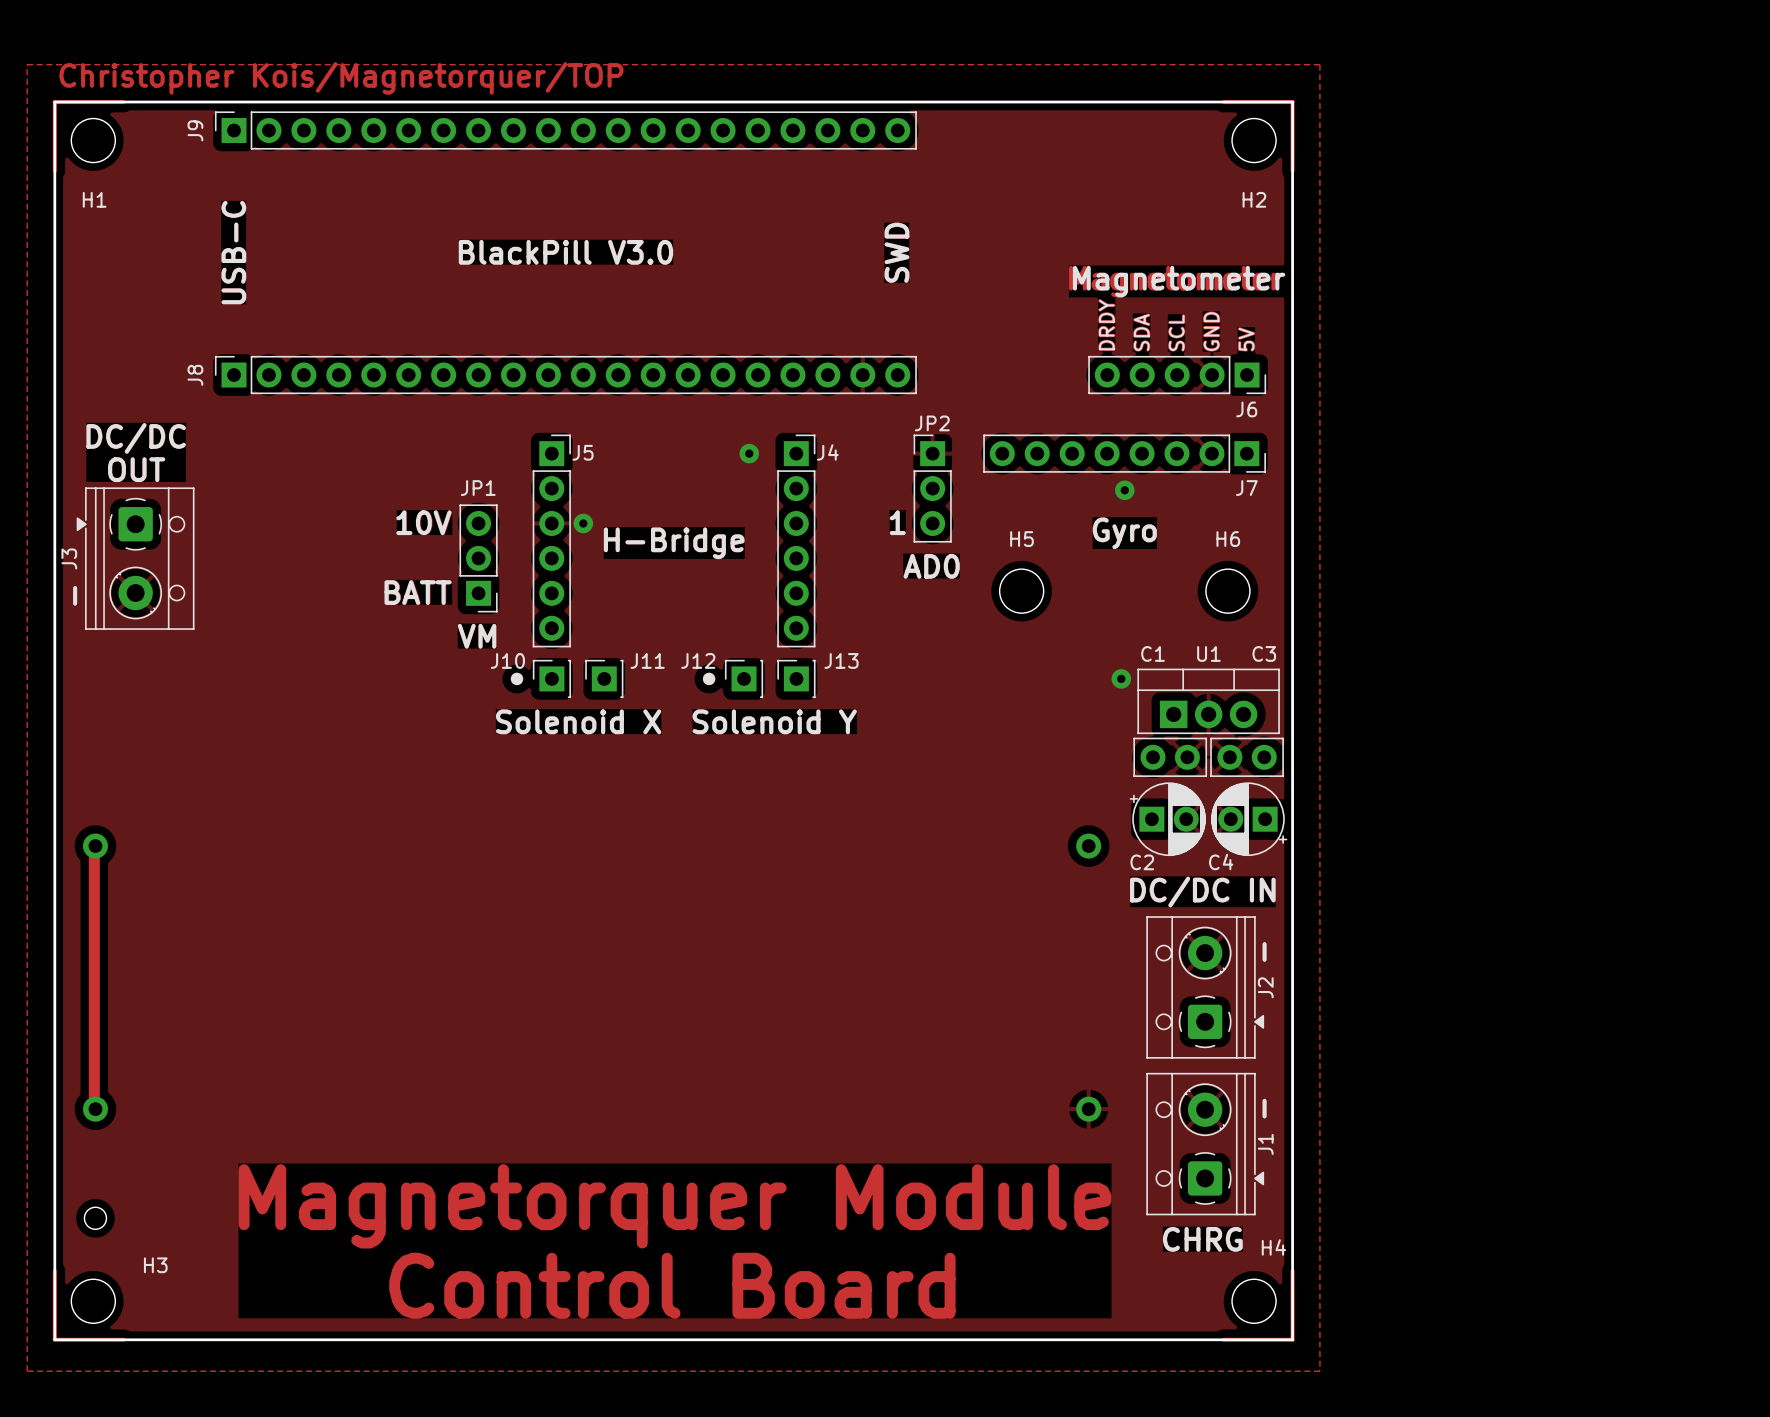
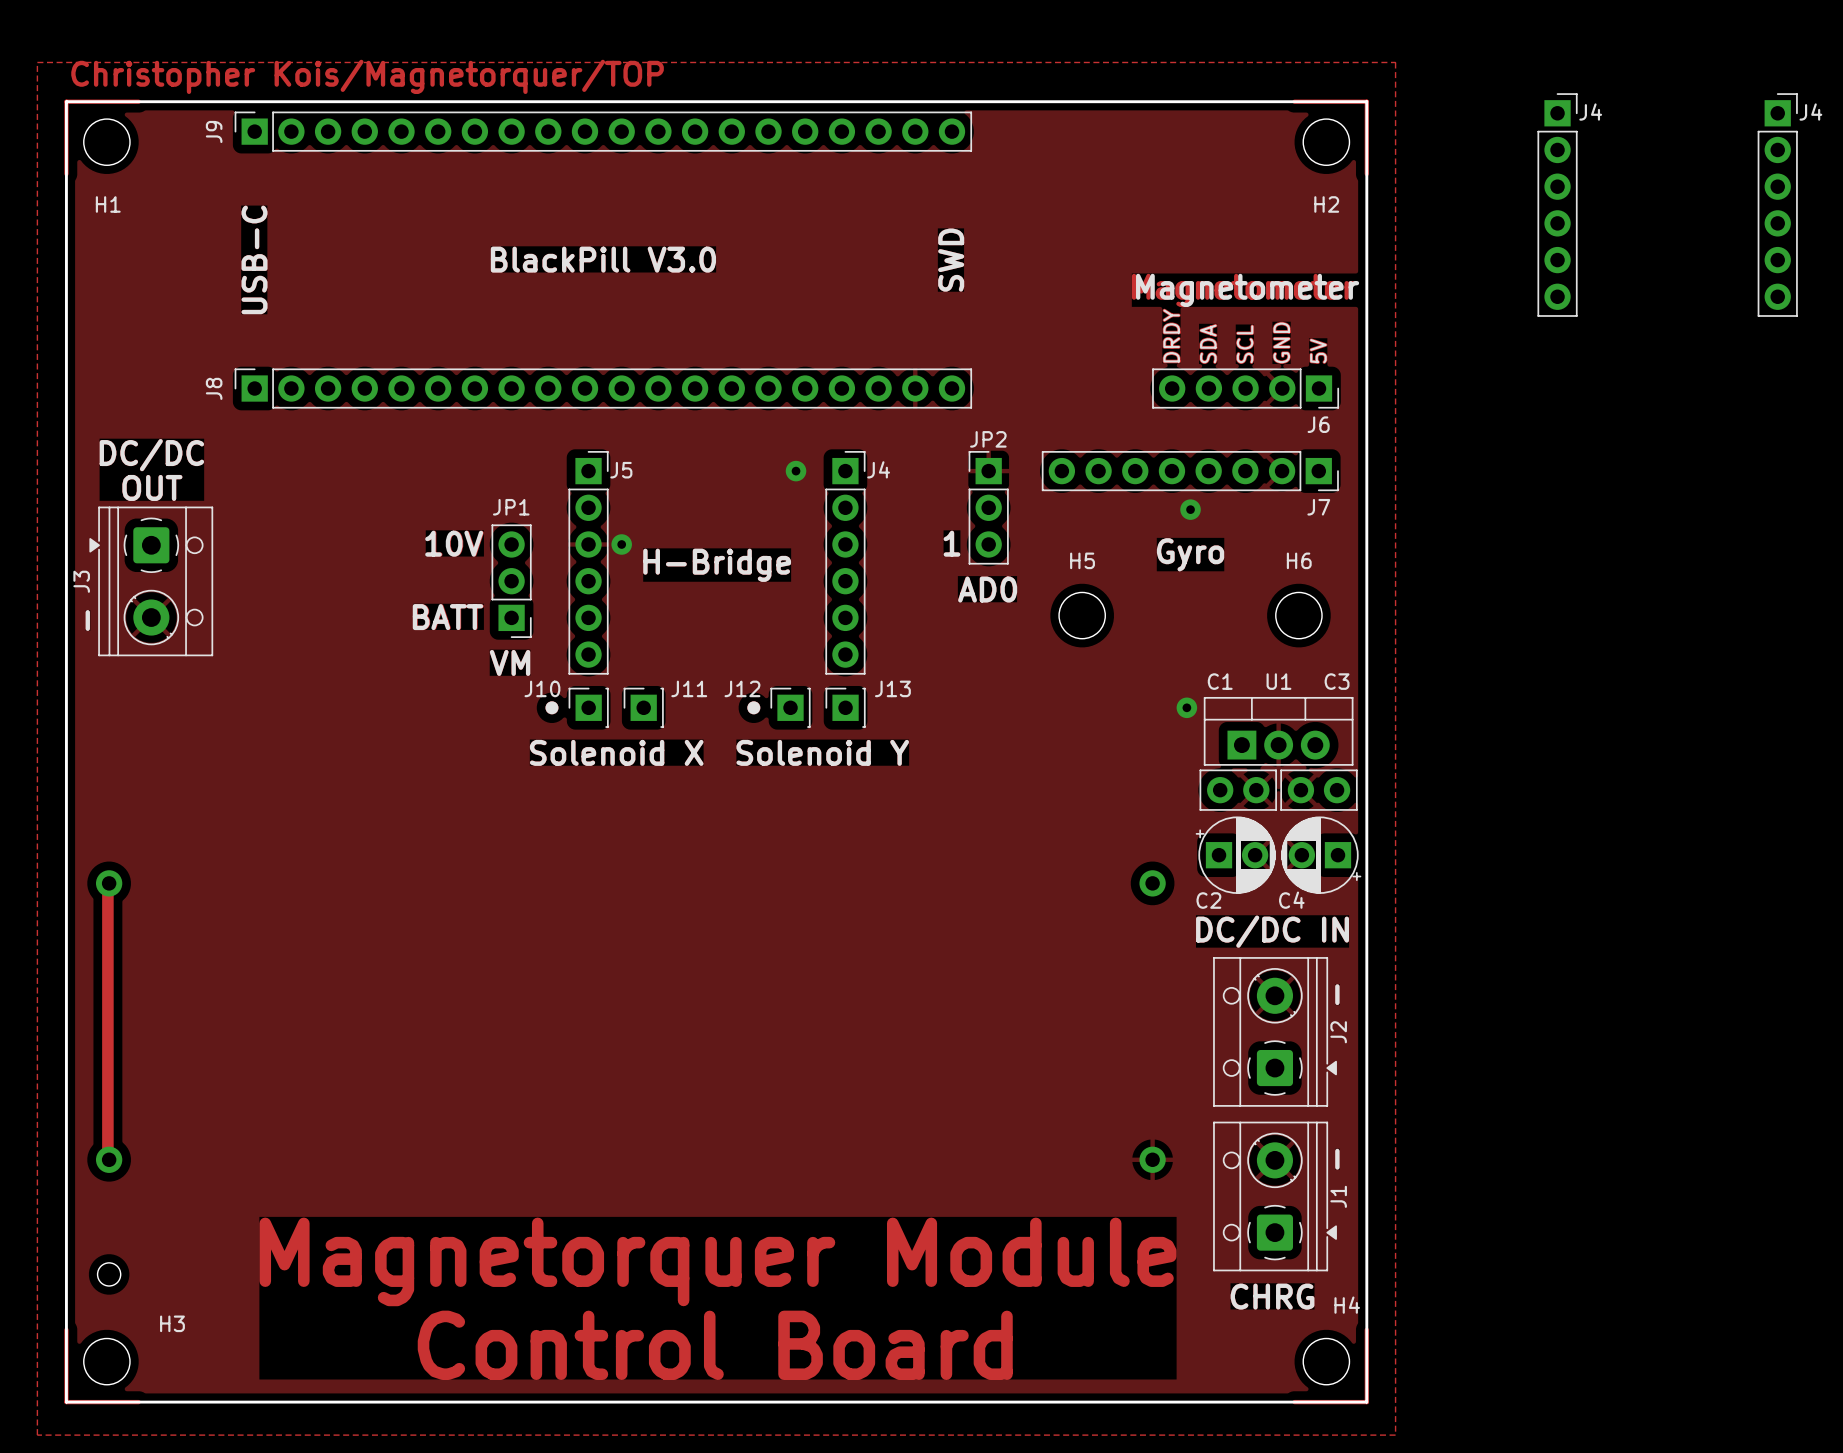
J4: none -> (1557, 205)
J4: none -> (1777, 205)

